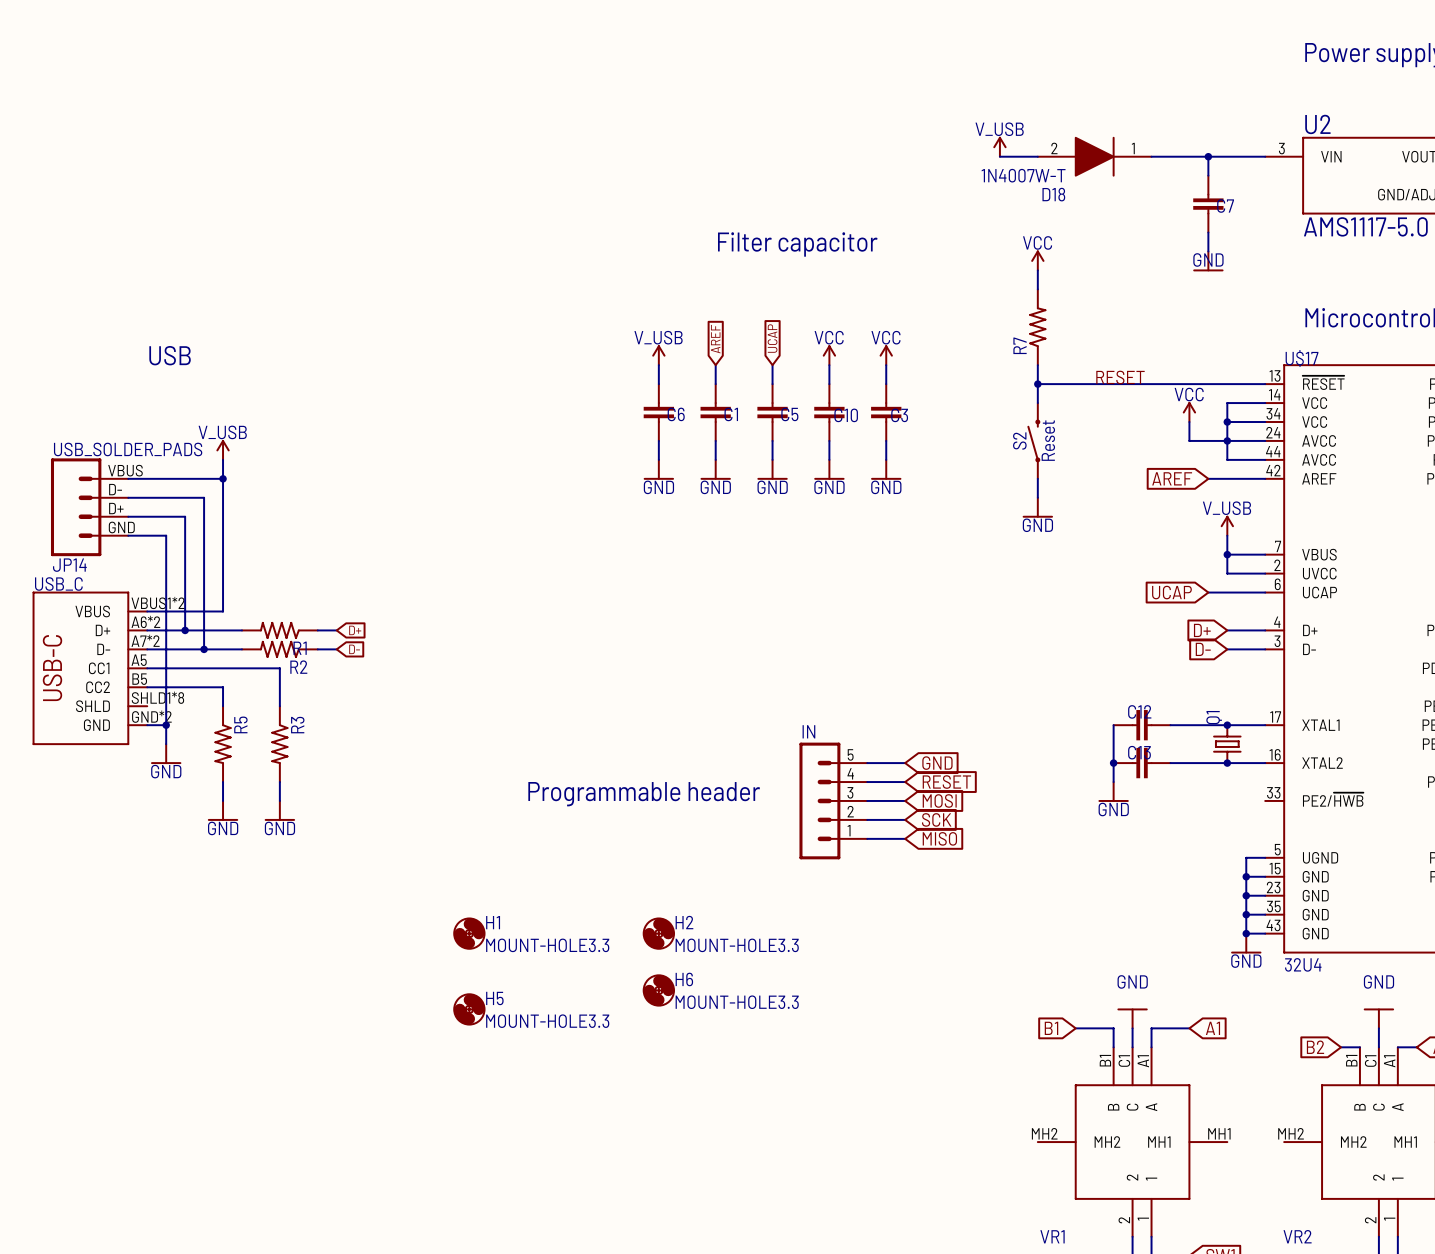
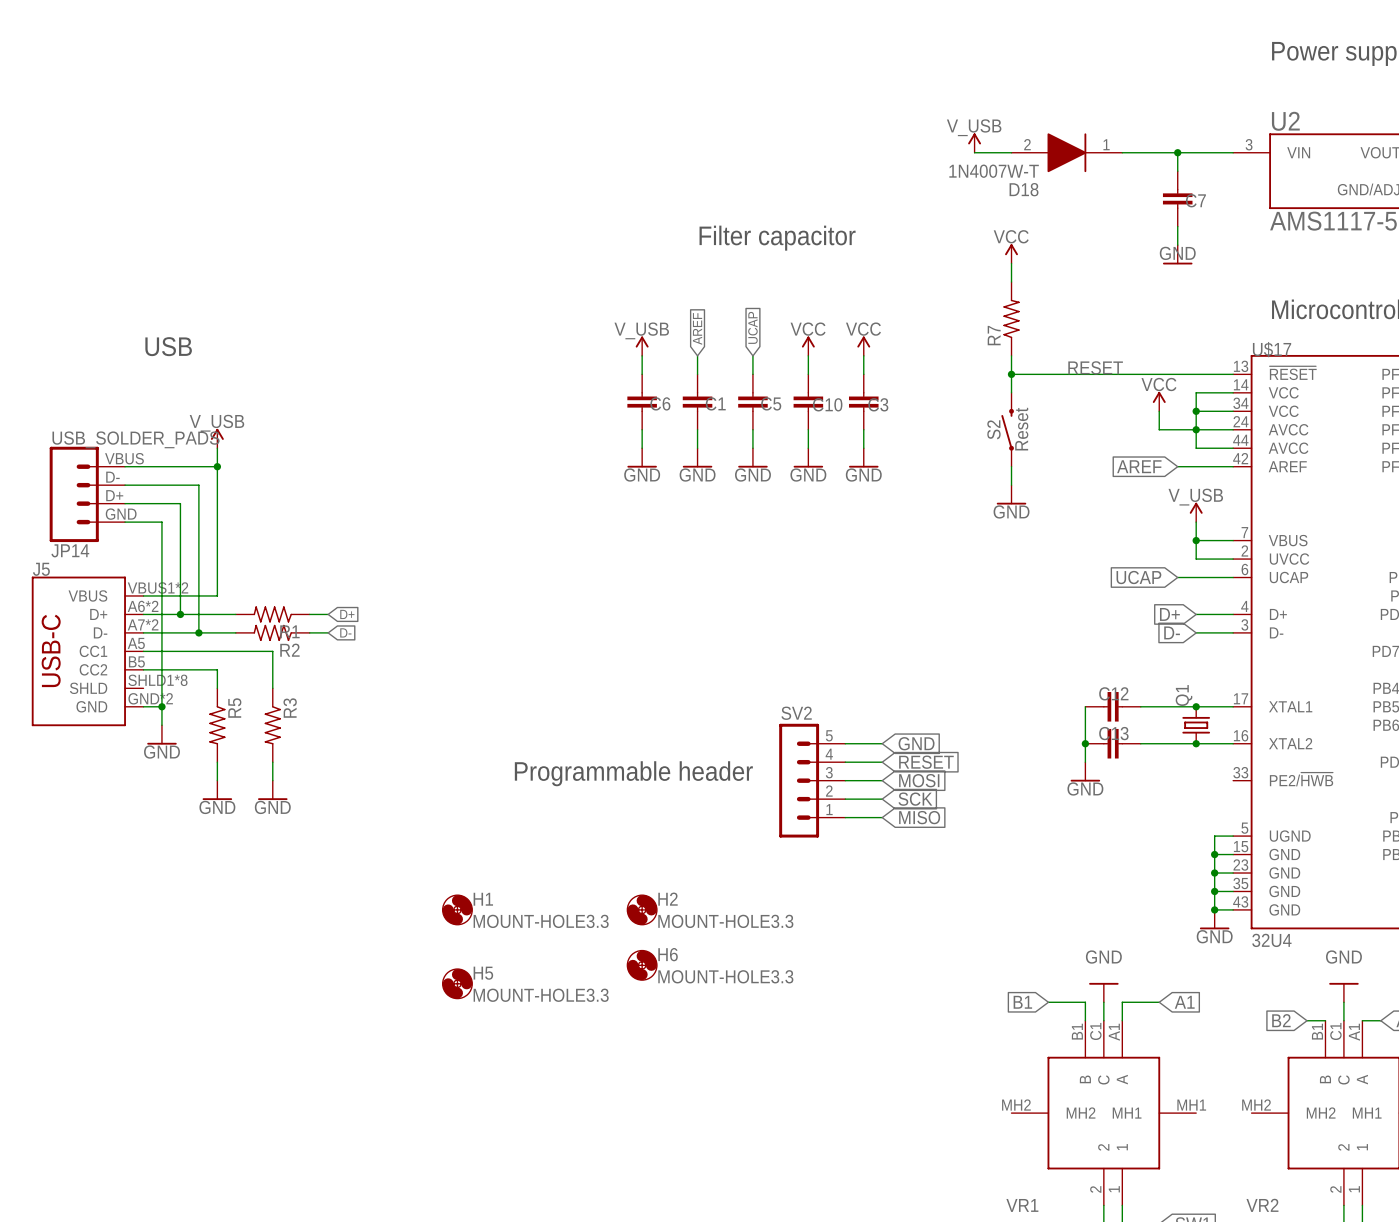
USB_C name: USB_C (58, 584) -> J5 (41, 569)
IN name: IN (808, 731) -> SV2 (796, 713)

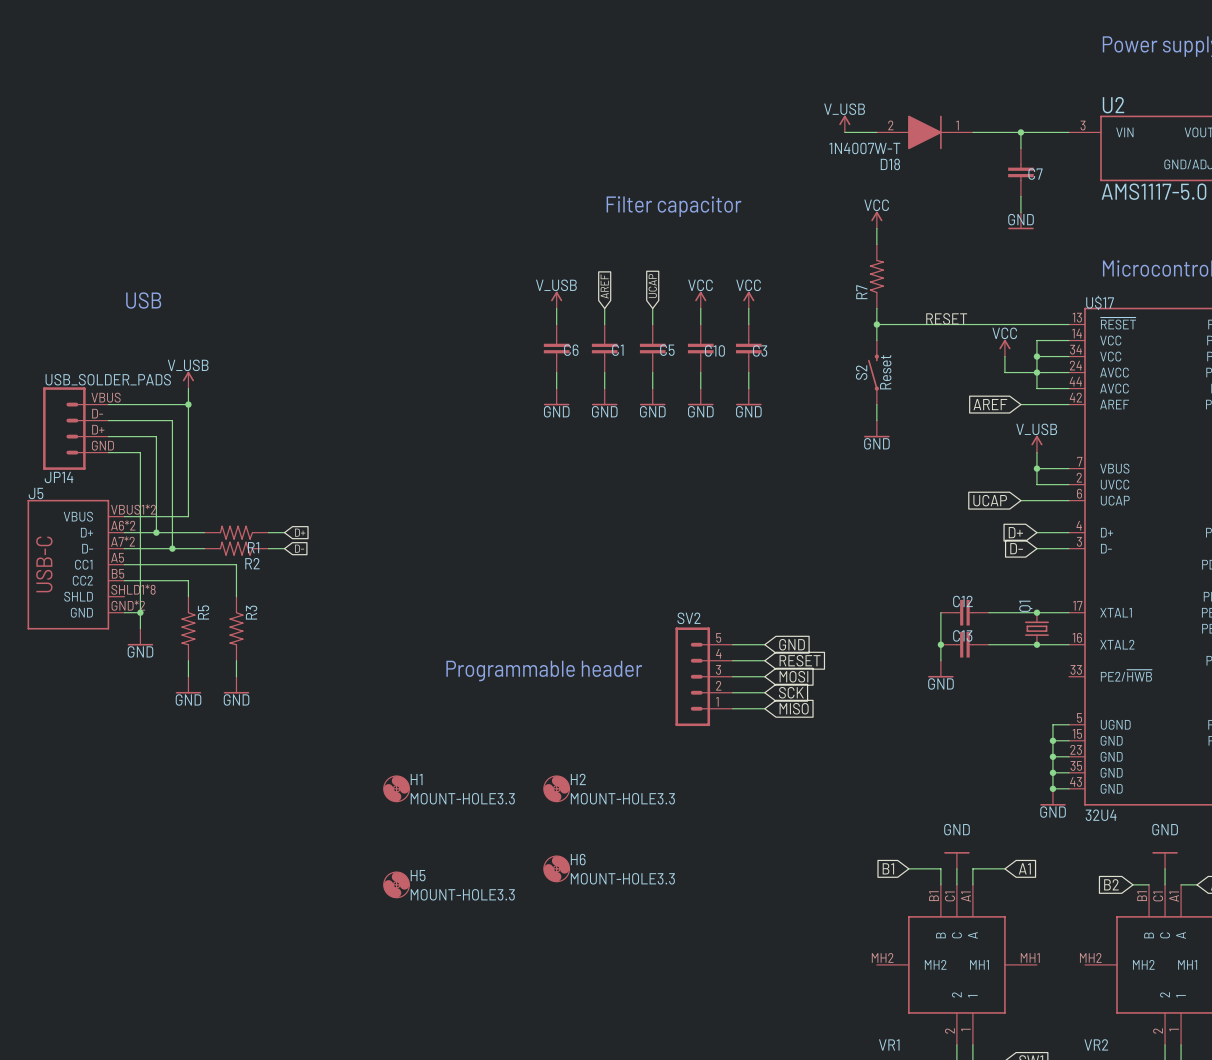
H6 position: (642, 965) -> (556, 868)
H5 position: (457, 983) -> (396, 884)

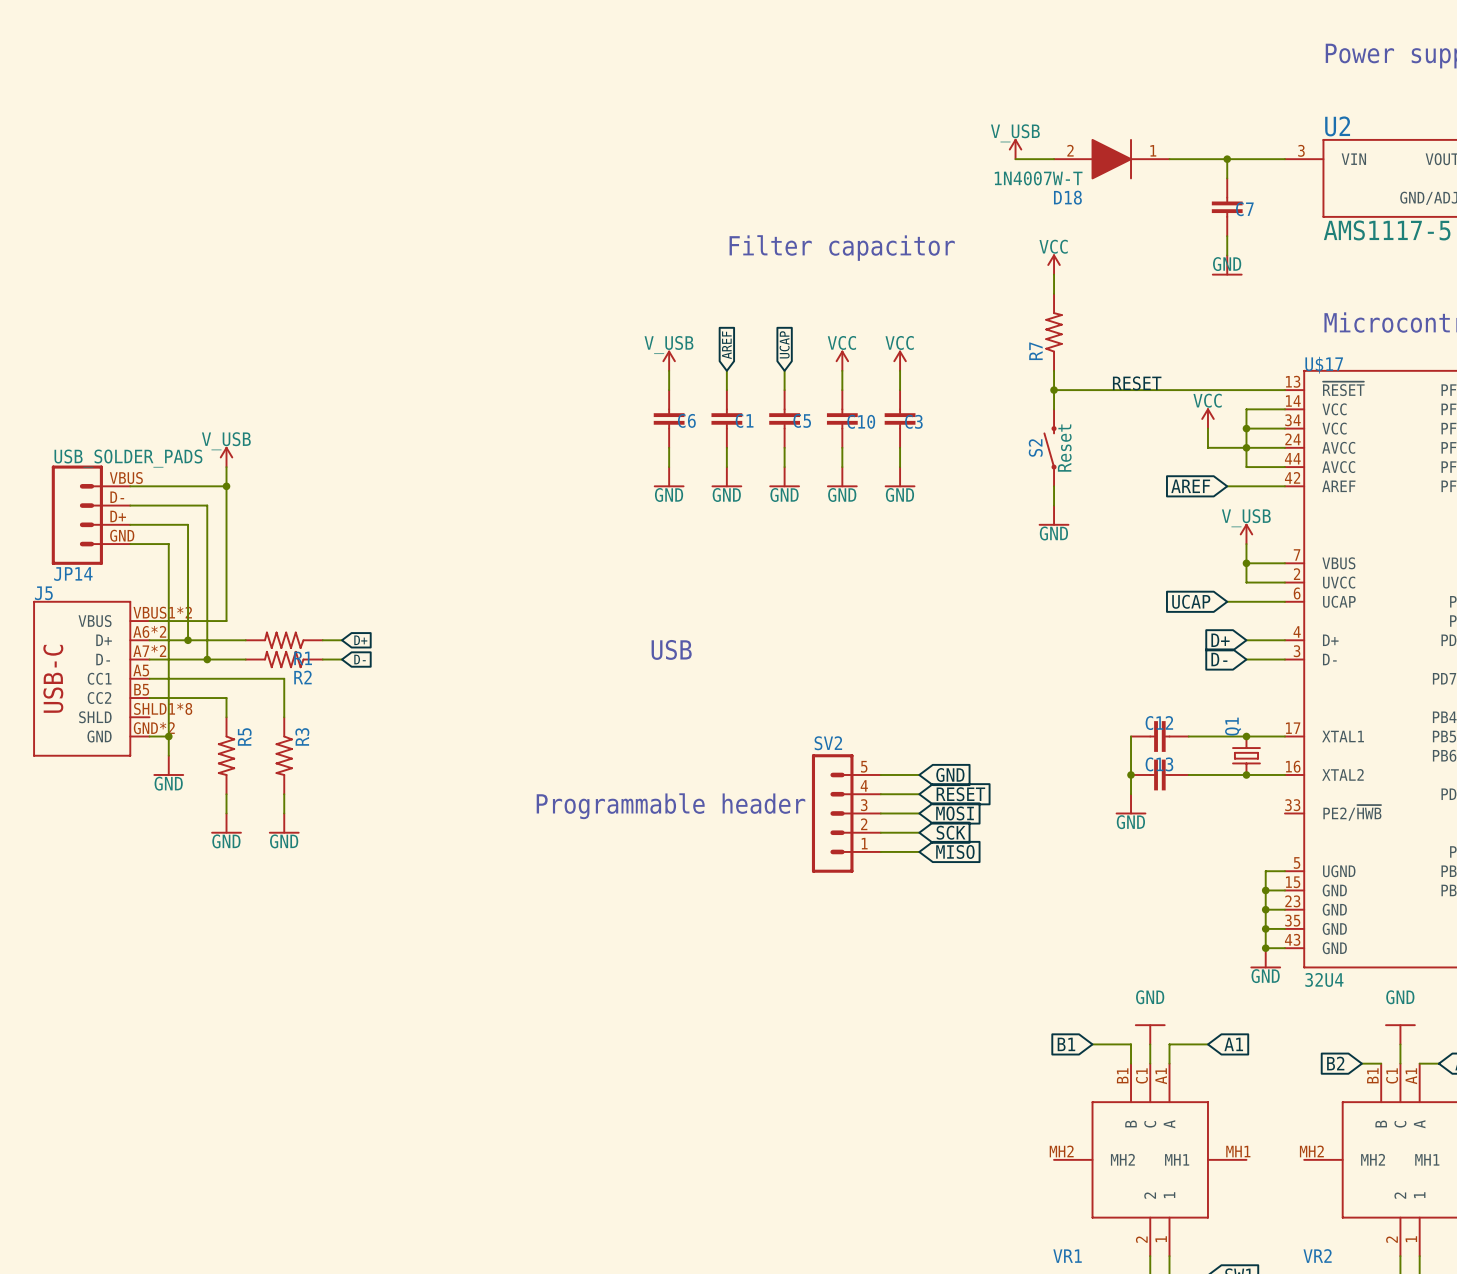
text: USB (143, 300) -> none
text: none -> USB (671, 649)
H1: MOUNT-HOLE3.3 (396, 788) -> none
H2: MOUNT-HOLE3.3 (556, 788) -> none
H6: MOUNT-HOLE3.3 (556, 868) -> none
H5: MOUNT-HOLE3.3 (396, 884) -> none

